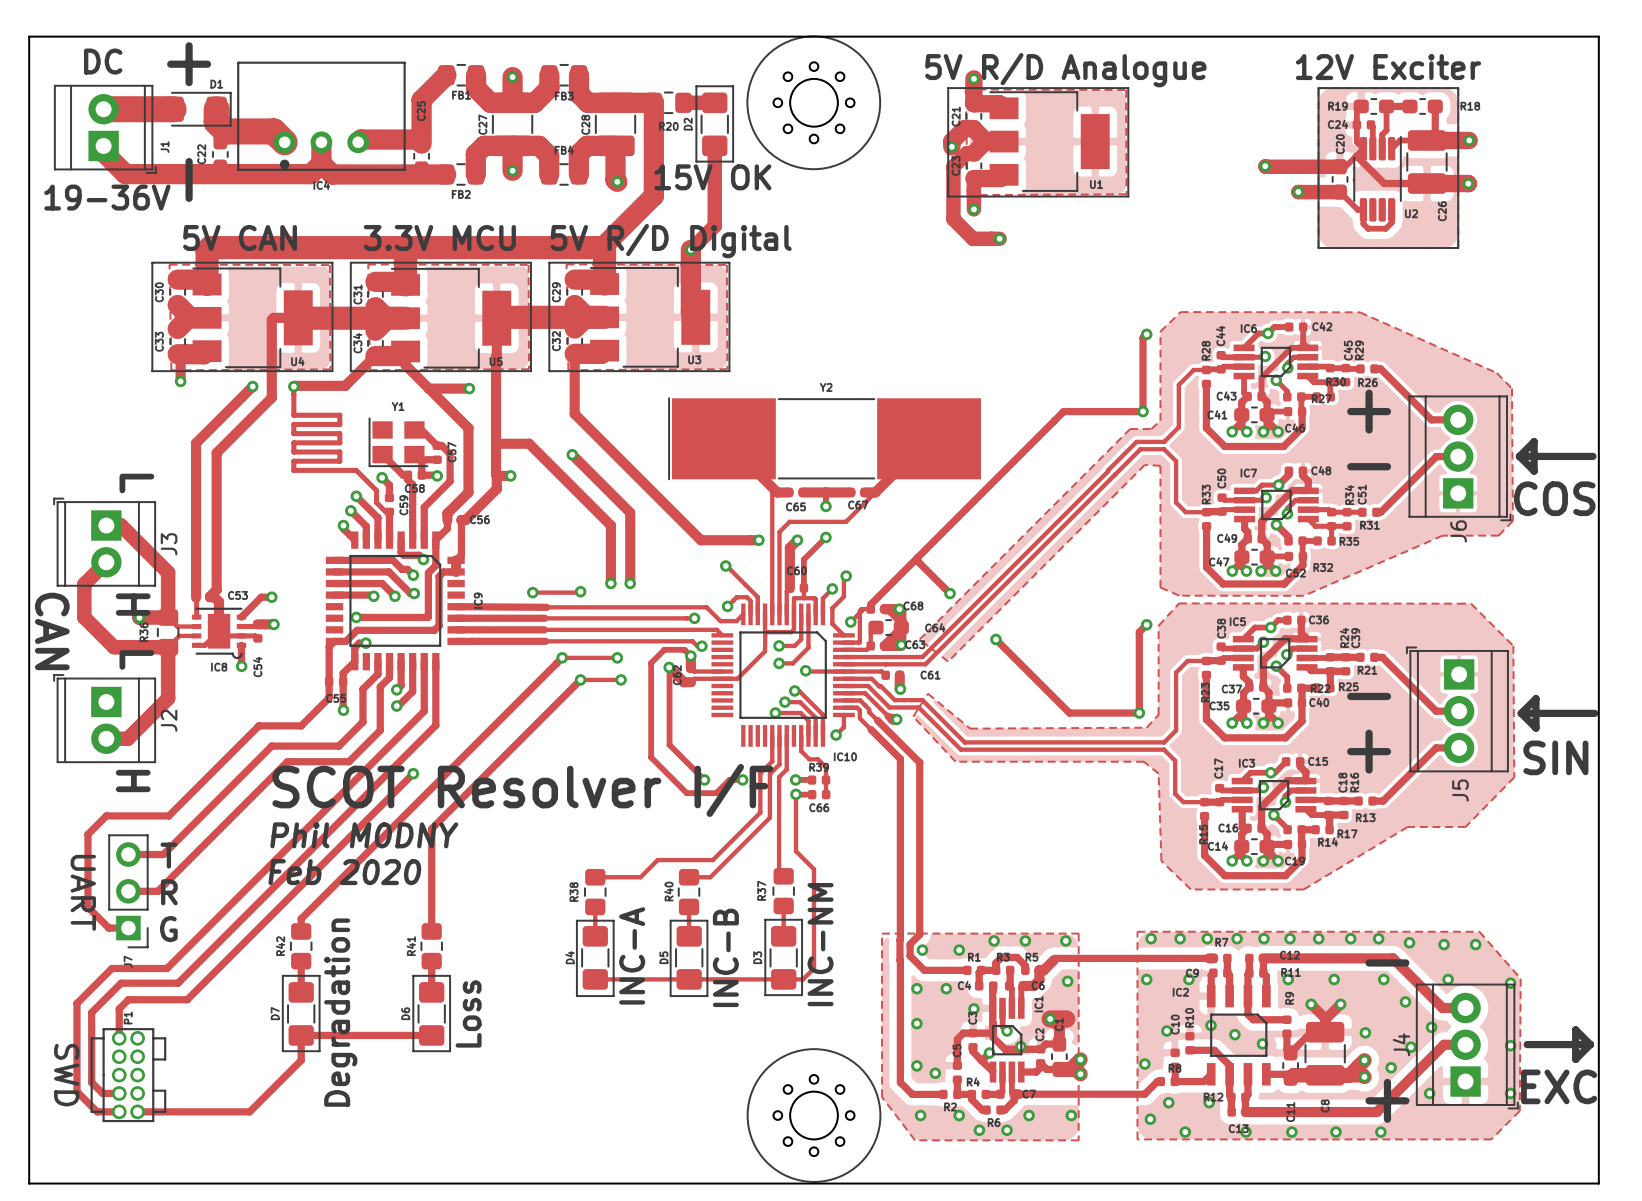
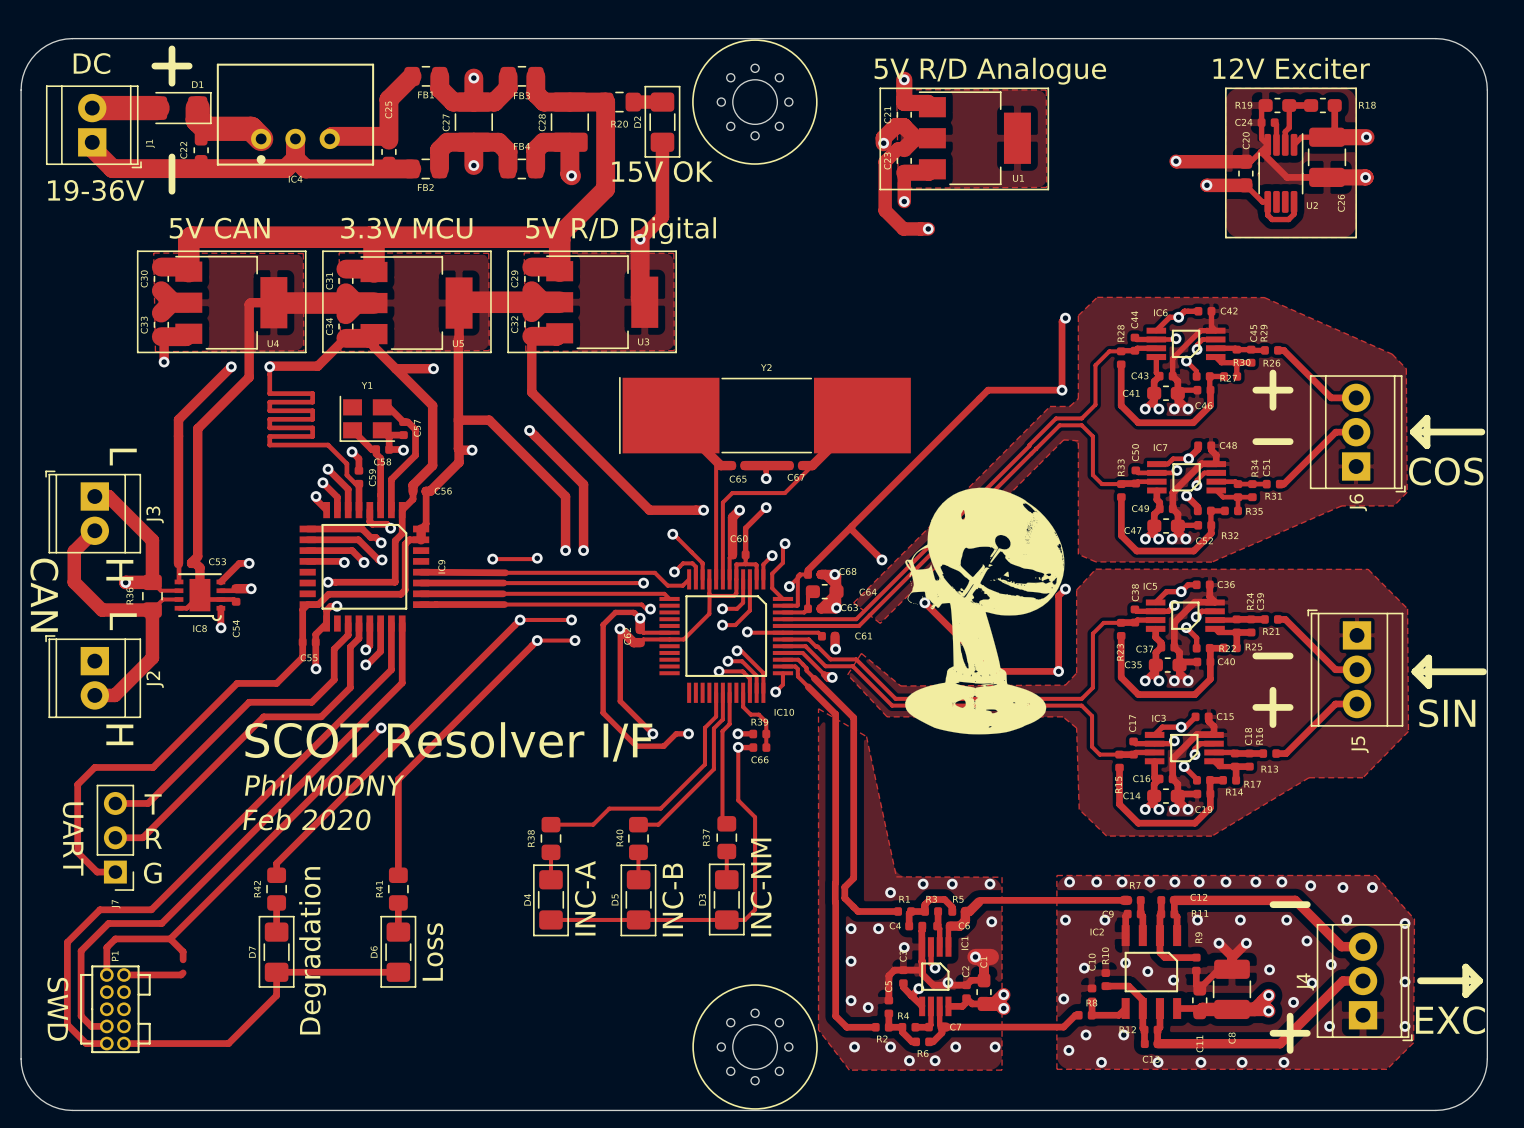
board edge: (1598, 89) (1598, 36) (29, 36) (29, 1183) (82, 1183) -> (1487, 90) (1483, 70) (1472, 53) (1455, 42) (1435, 38) (72, 38) (59, 40) (41, 49) (31, 58) (24, 70) (21, 90) (21, 1058) (24, 1078) (36, 1095) (52, 1106) (72, 1110)
drawing: none -> [905, 487, 1065, 735]
zone outline: (882, 933) (1078, 933) -> (818, 877) (818, 708) (866, 736) (896, 876) (1002, 877)
via: (922, 950) -> none
track: none -> (170, 938) (183, 951) (183, 959)
track: none -> (183, 972) (181, 974) (123, 974)
board edge: (1598, 1128) (1598, 1183) (1543, 1183) -> (1487, 1058) (1483, 1078) (1472, 1095) (1455, 1106) (1435, 1110)

